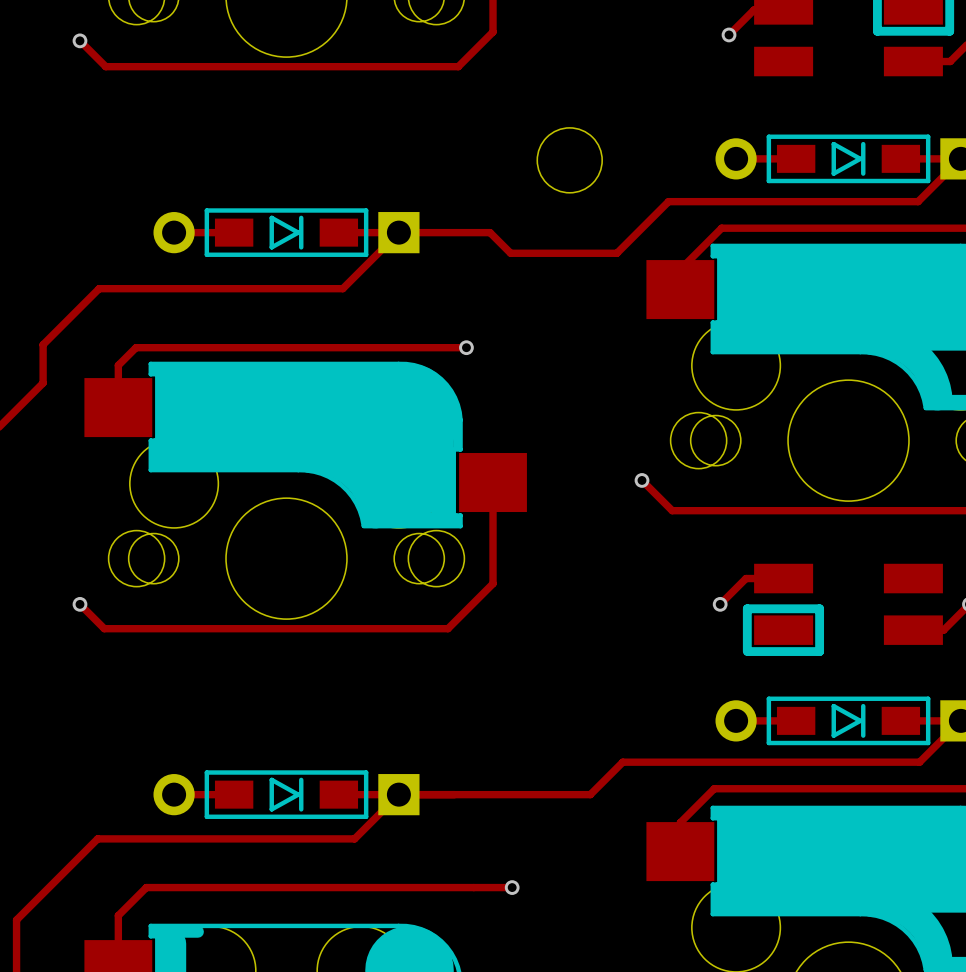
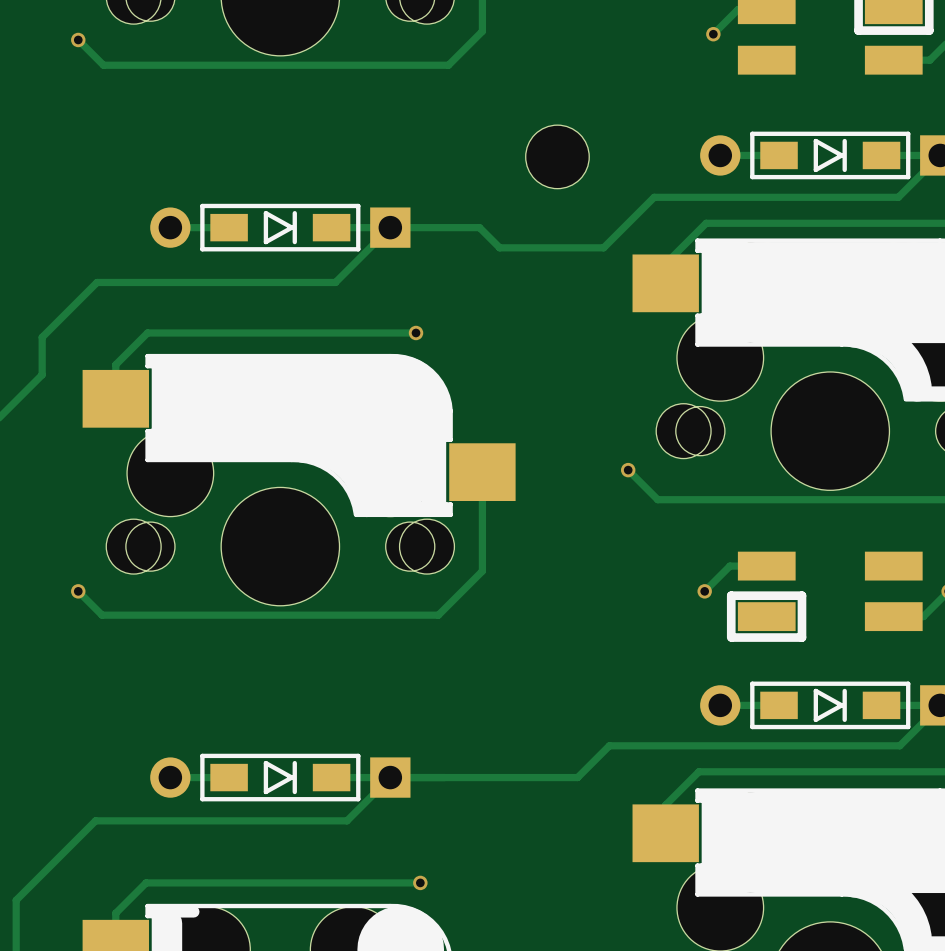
track: (466, 347) (136, 347) (118, 365) (118, 372) -> (416, 332) (147, 332) (115, 364)
via position: (466, 347) -> (416, 332)
track: (512, 887) (146, 887) (118, 915) (118, 933) -> (420, 882) (146, 882) (115, 913)
via position: (512, 887) -> (420, 882)

